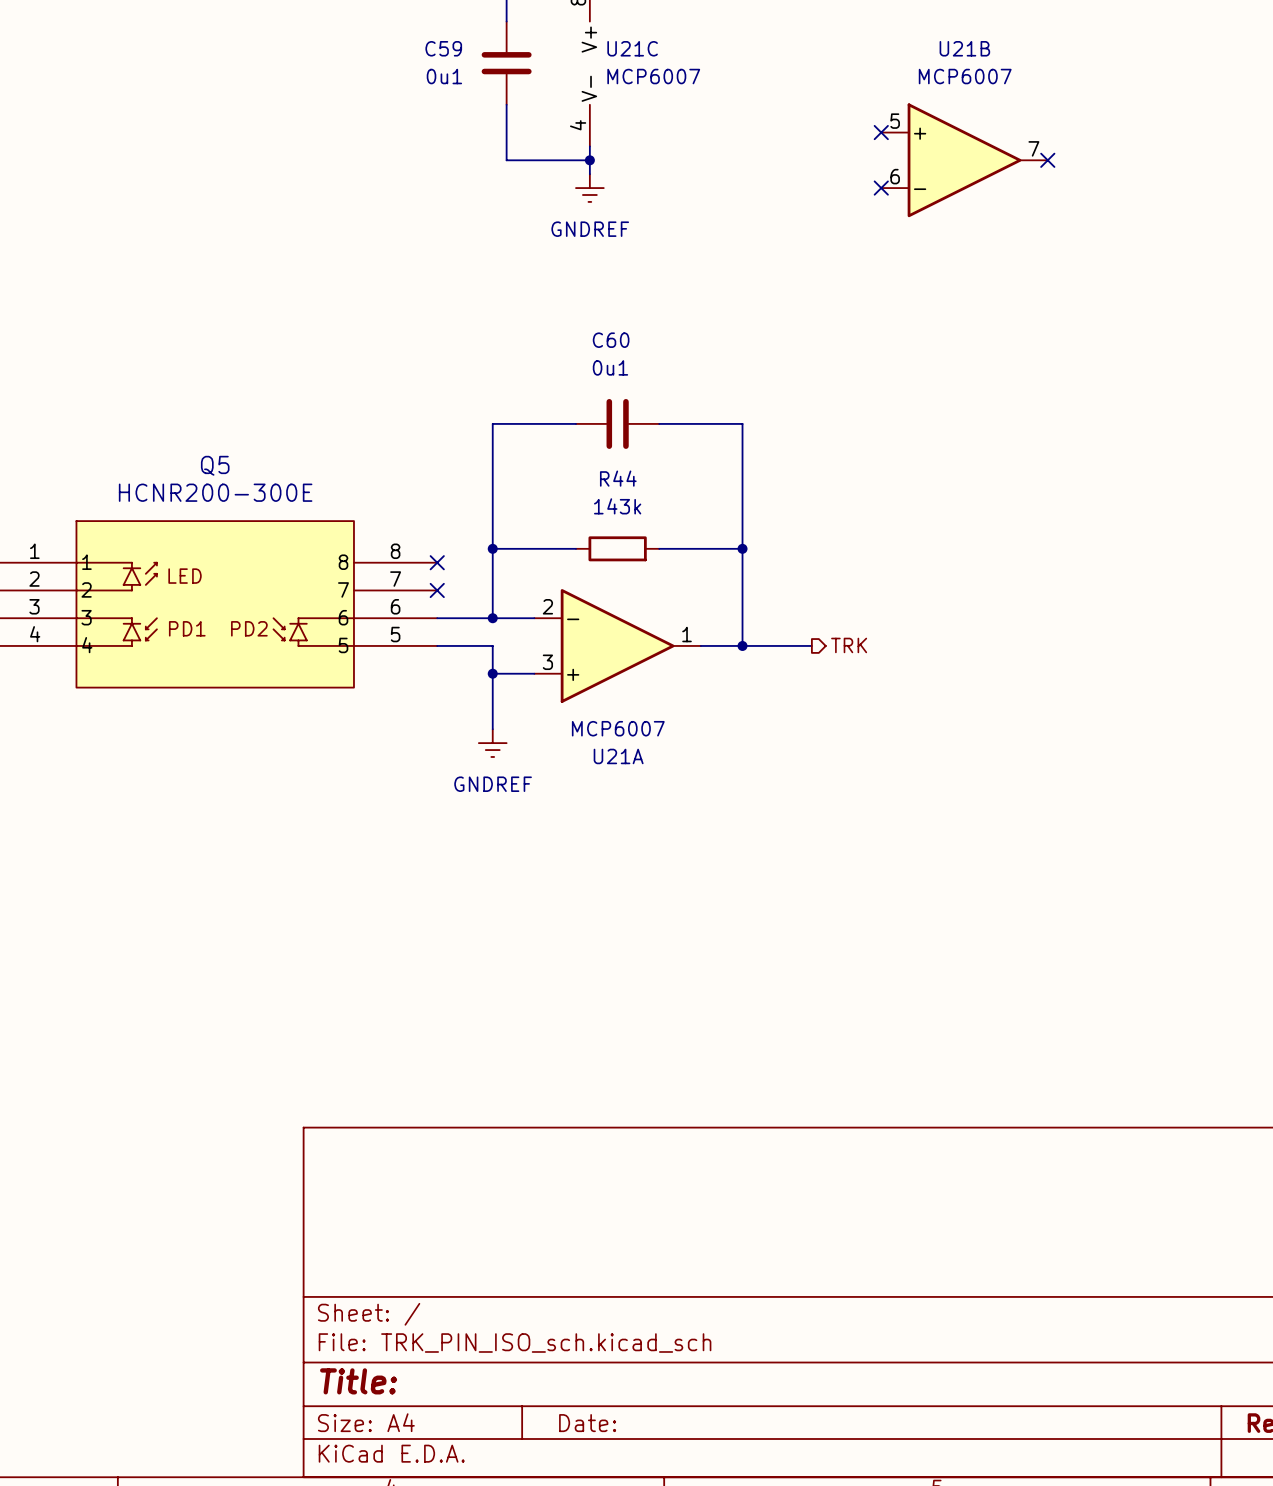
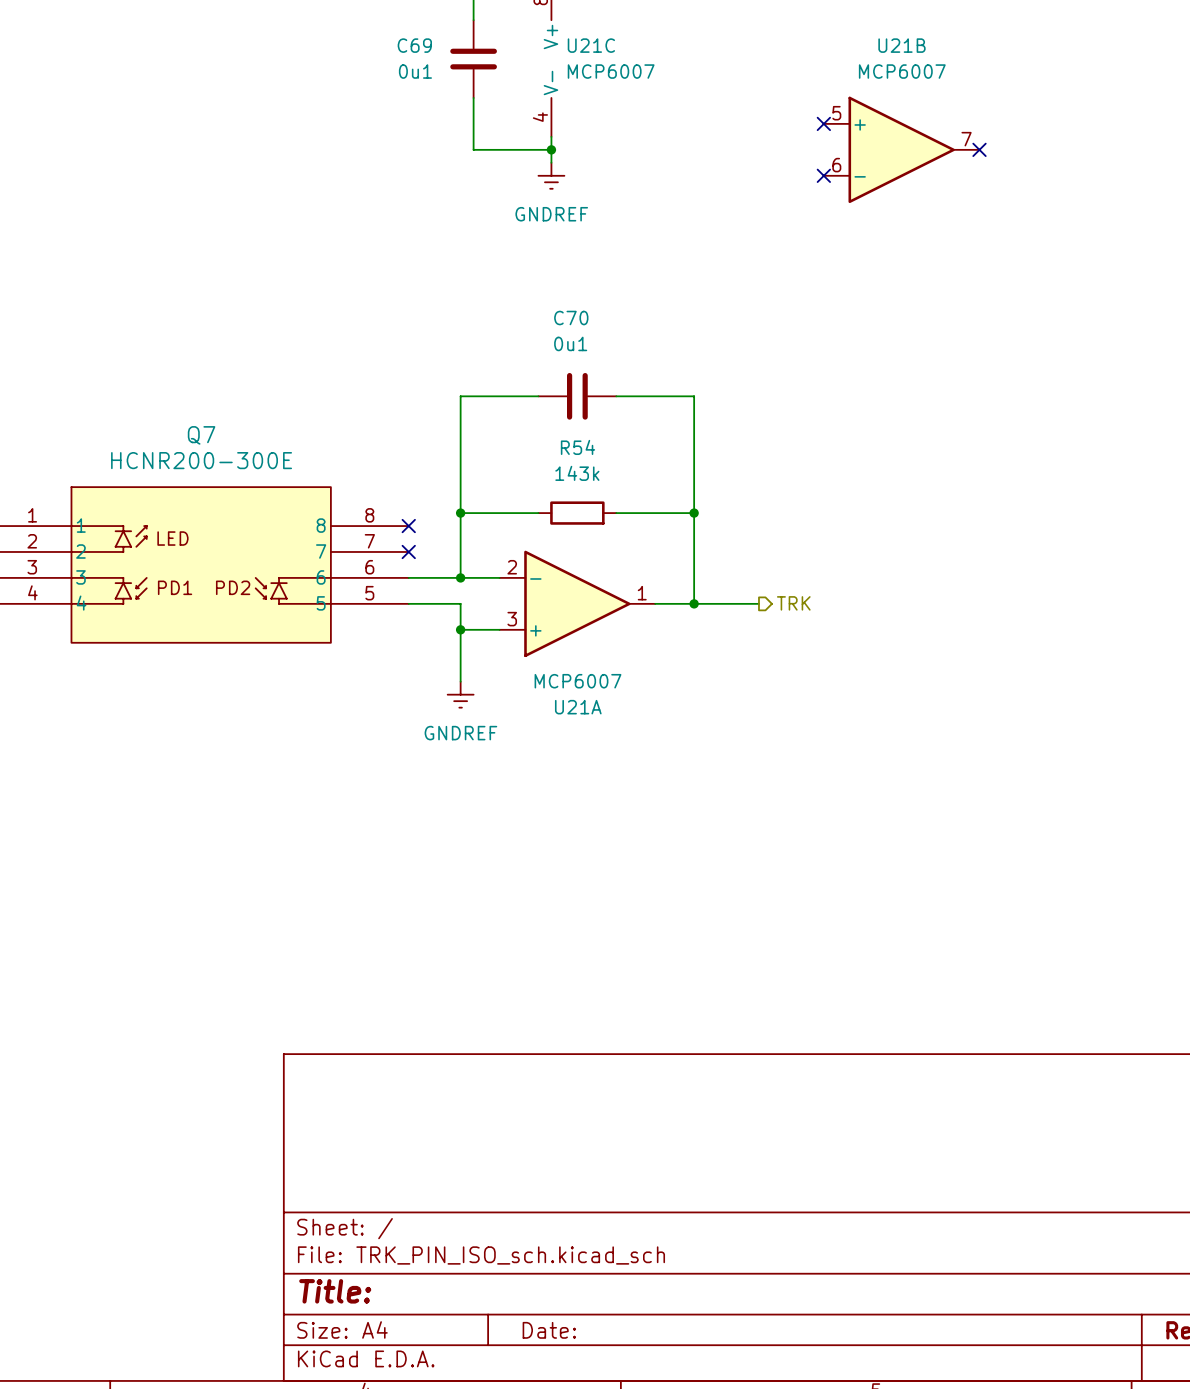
C59 name: C59 (443, 48) -> C69 (414, 45)
C60 name: C60 (611, 340) -> C70 (571, 318)
Q5 name: Q5 (215, 465) -> Q7 (201, 435)
R44 name: R44 (618, 478) -> R54 (577, 447)

